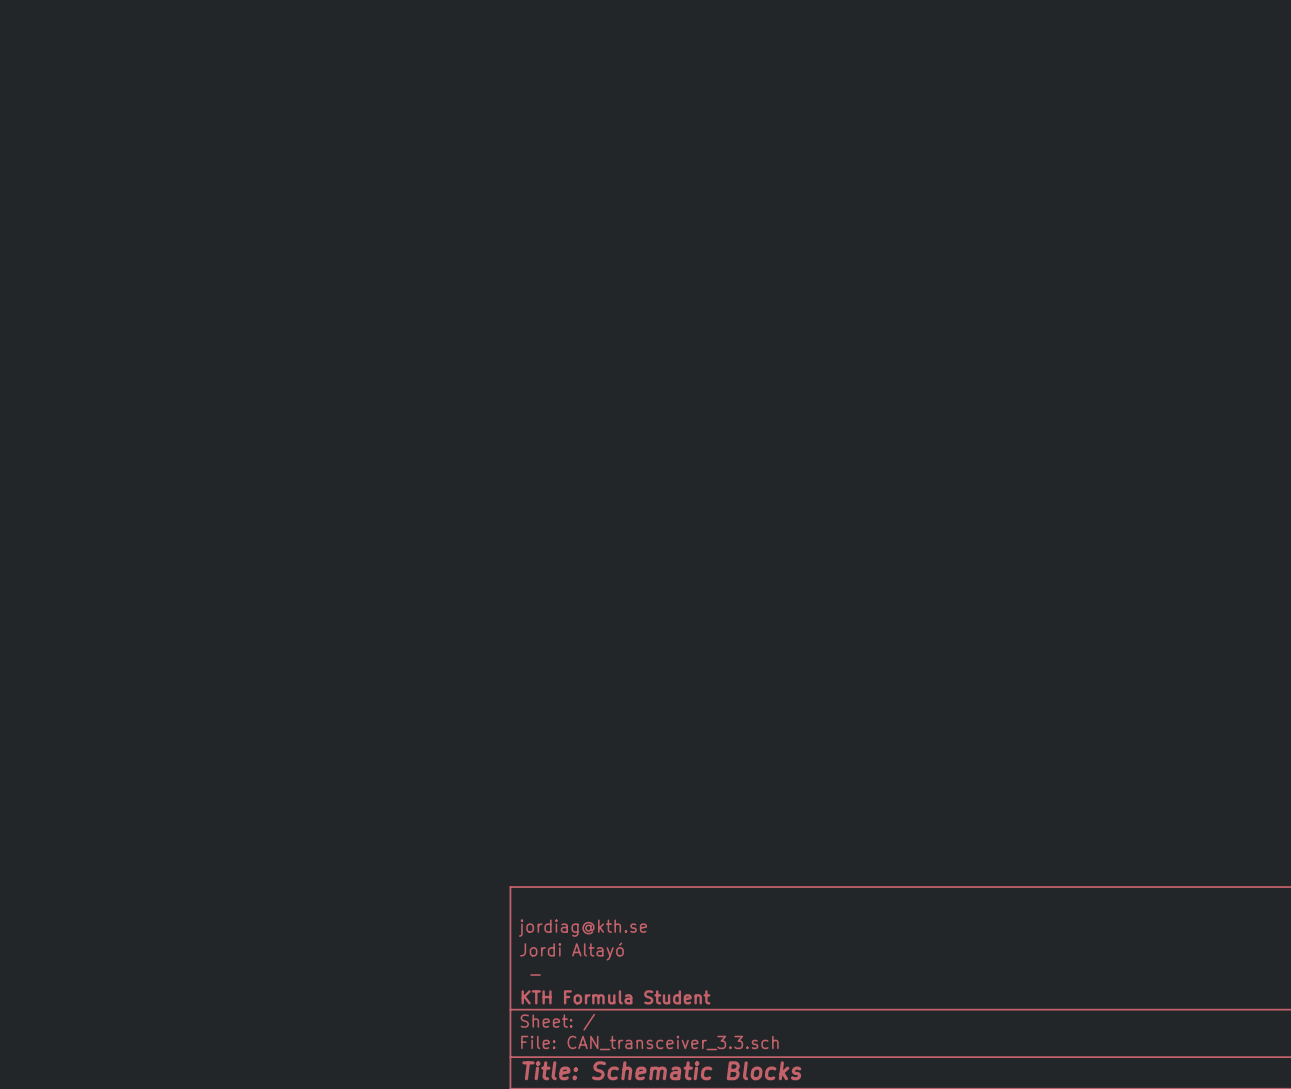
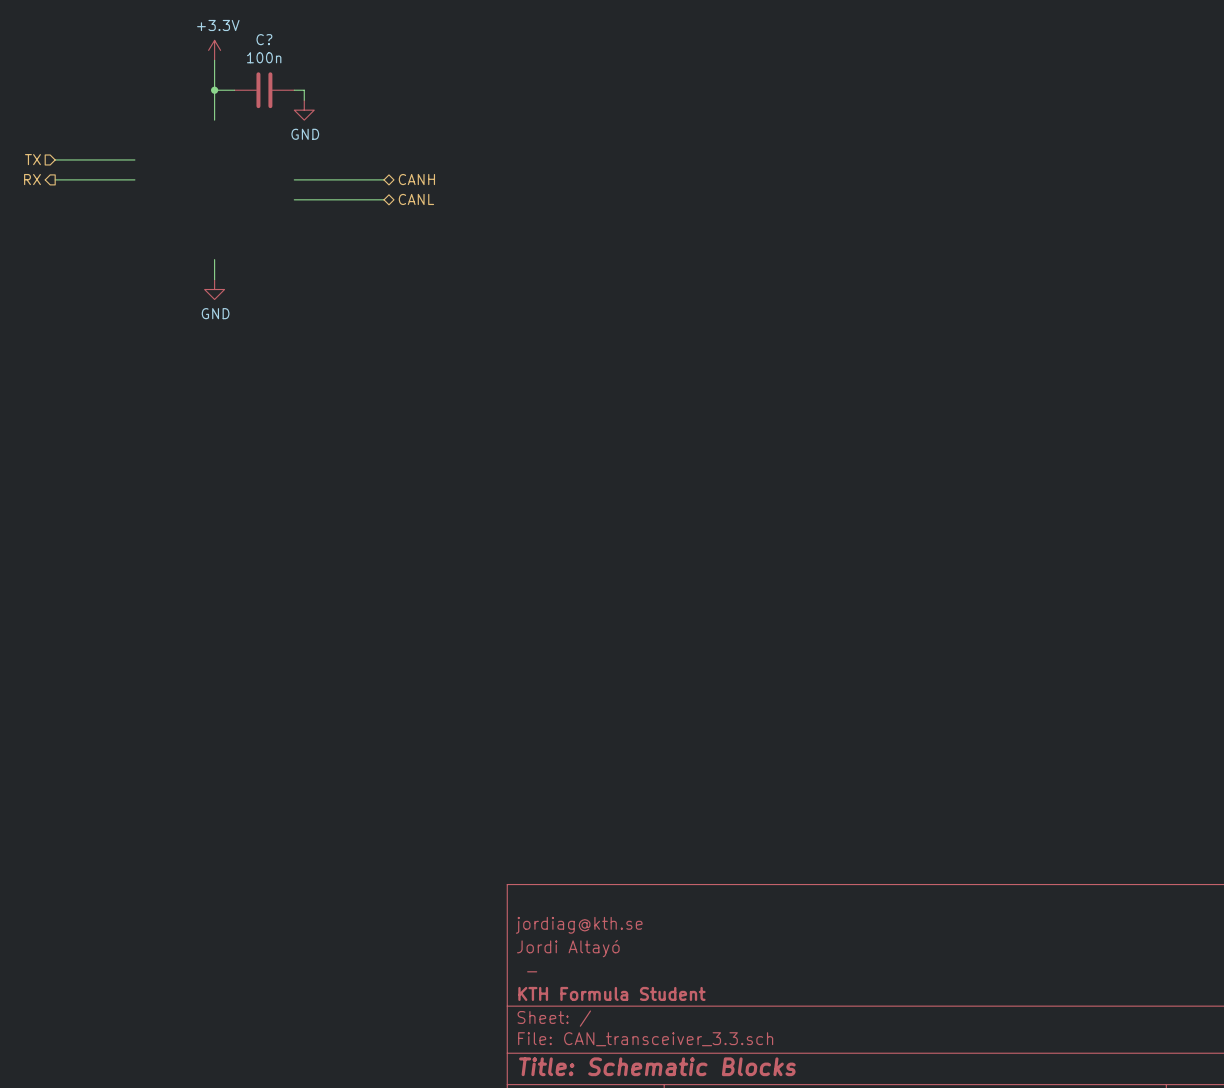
power symbol: none -> +3.3V (214, 50)
wire: none -> (214, 60) (214, 120)
wire: none -> (214, 90) (234, 90)
junction: none -> (214, 90)
C?: none -> 100n (264, 90)
wire: none -> (294, 90) (304, 90) (304, 100)
power symbol: none -> GND (304, 110)
hierarchical label: none -> TX (32, 159)
wire: none -> (55, 159) (134, 159)
hierarchical label: none -> RX (32, 179)
wire: none -> (55, 179) (134, 179)
wire: none -> (294, 179) (384, 179)
hierarchical label: none -> CANH (416, 179)
wire: none -> (294, 199) (384, 199)
hierarchical label: none -> CANL (416, 199)
wire: none -> (214, 259) (214, 279)
power symbol: none -> GND (214, 289)

